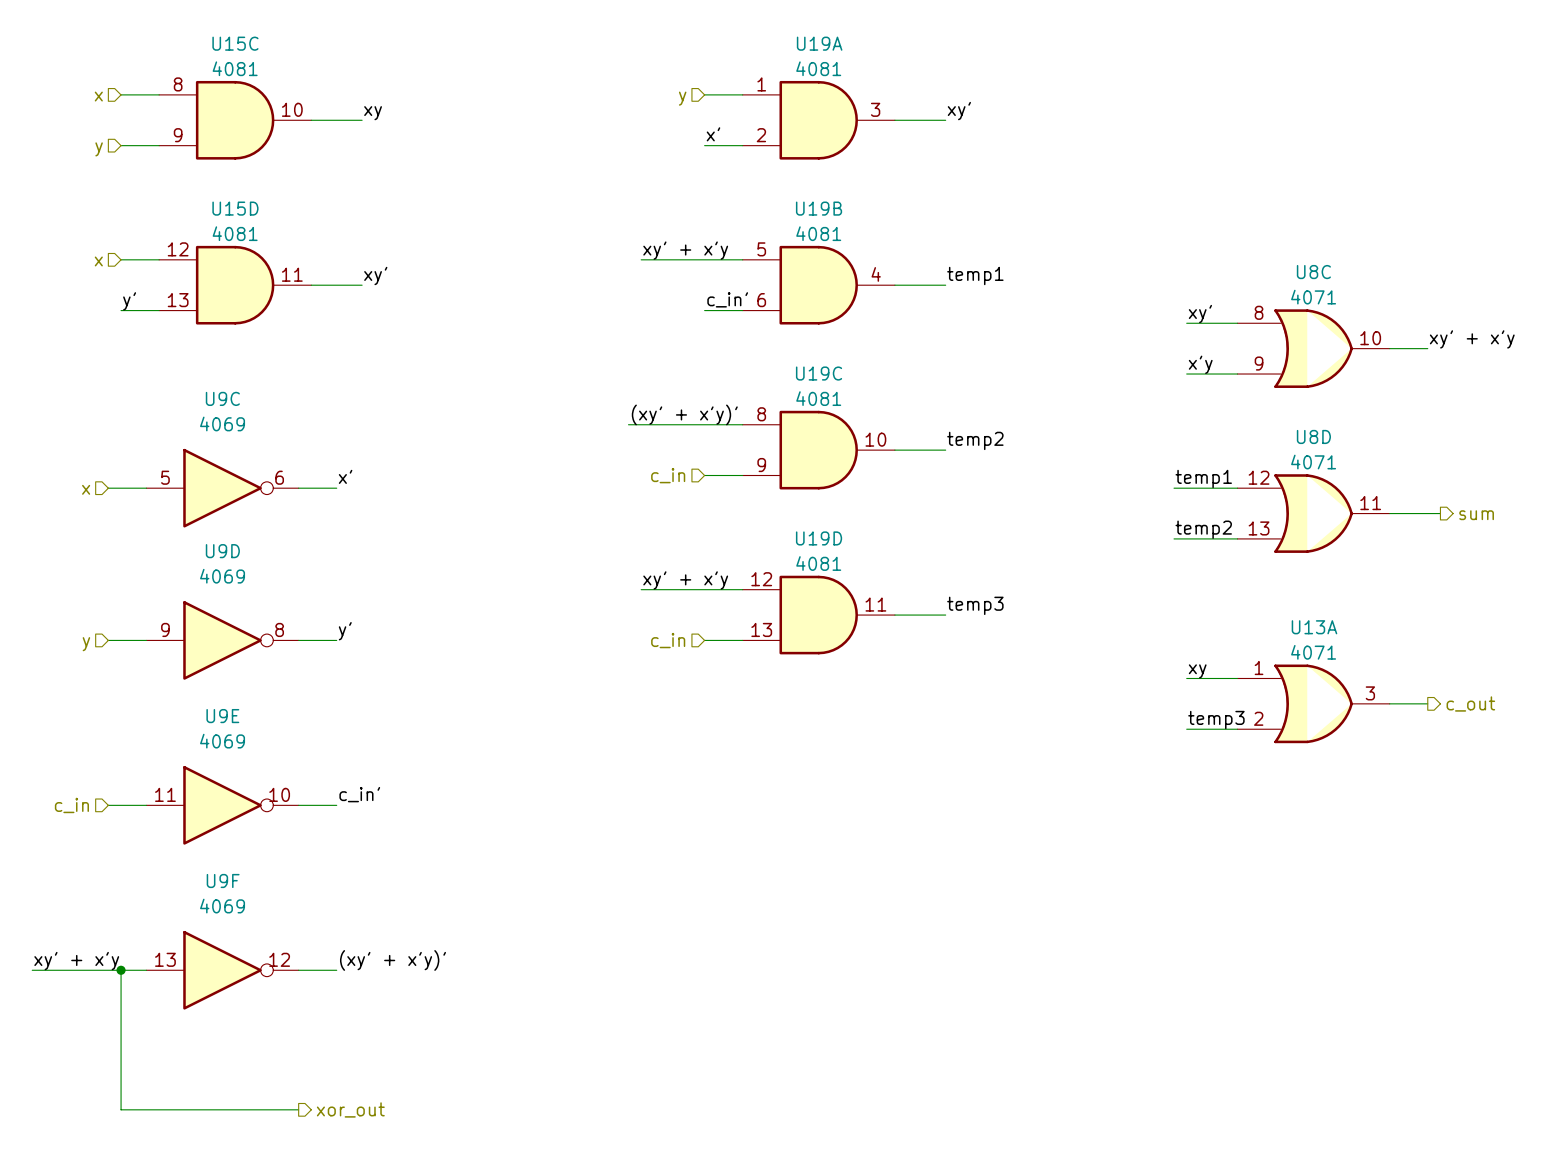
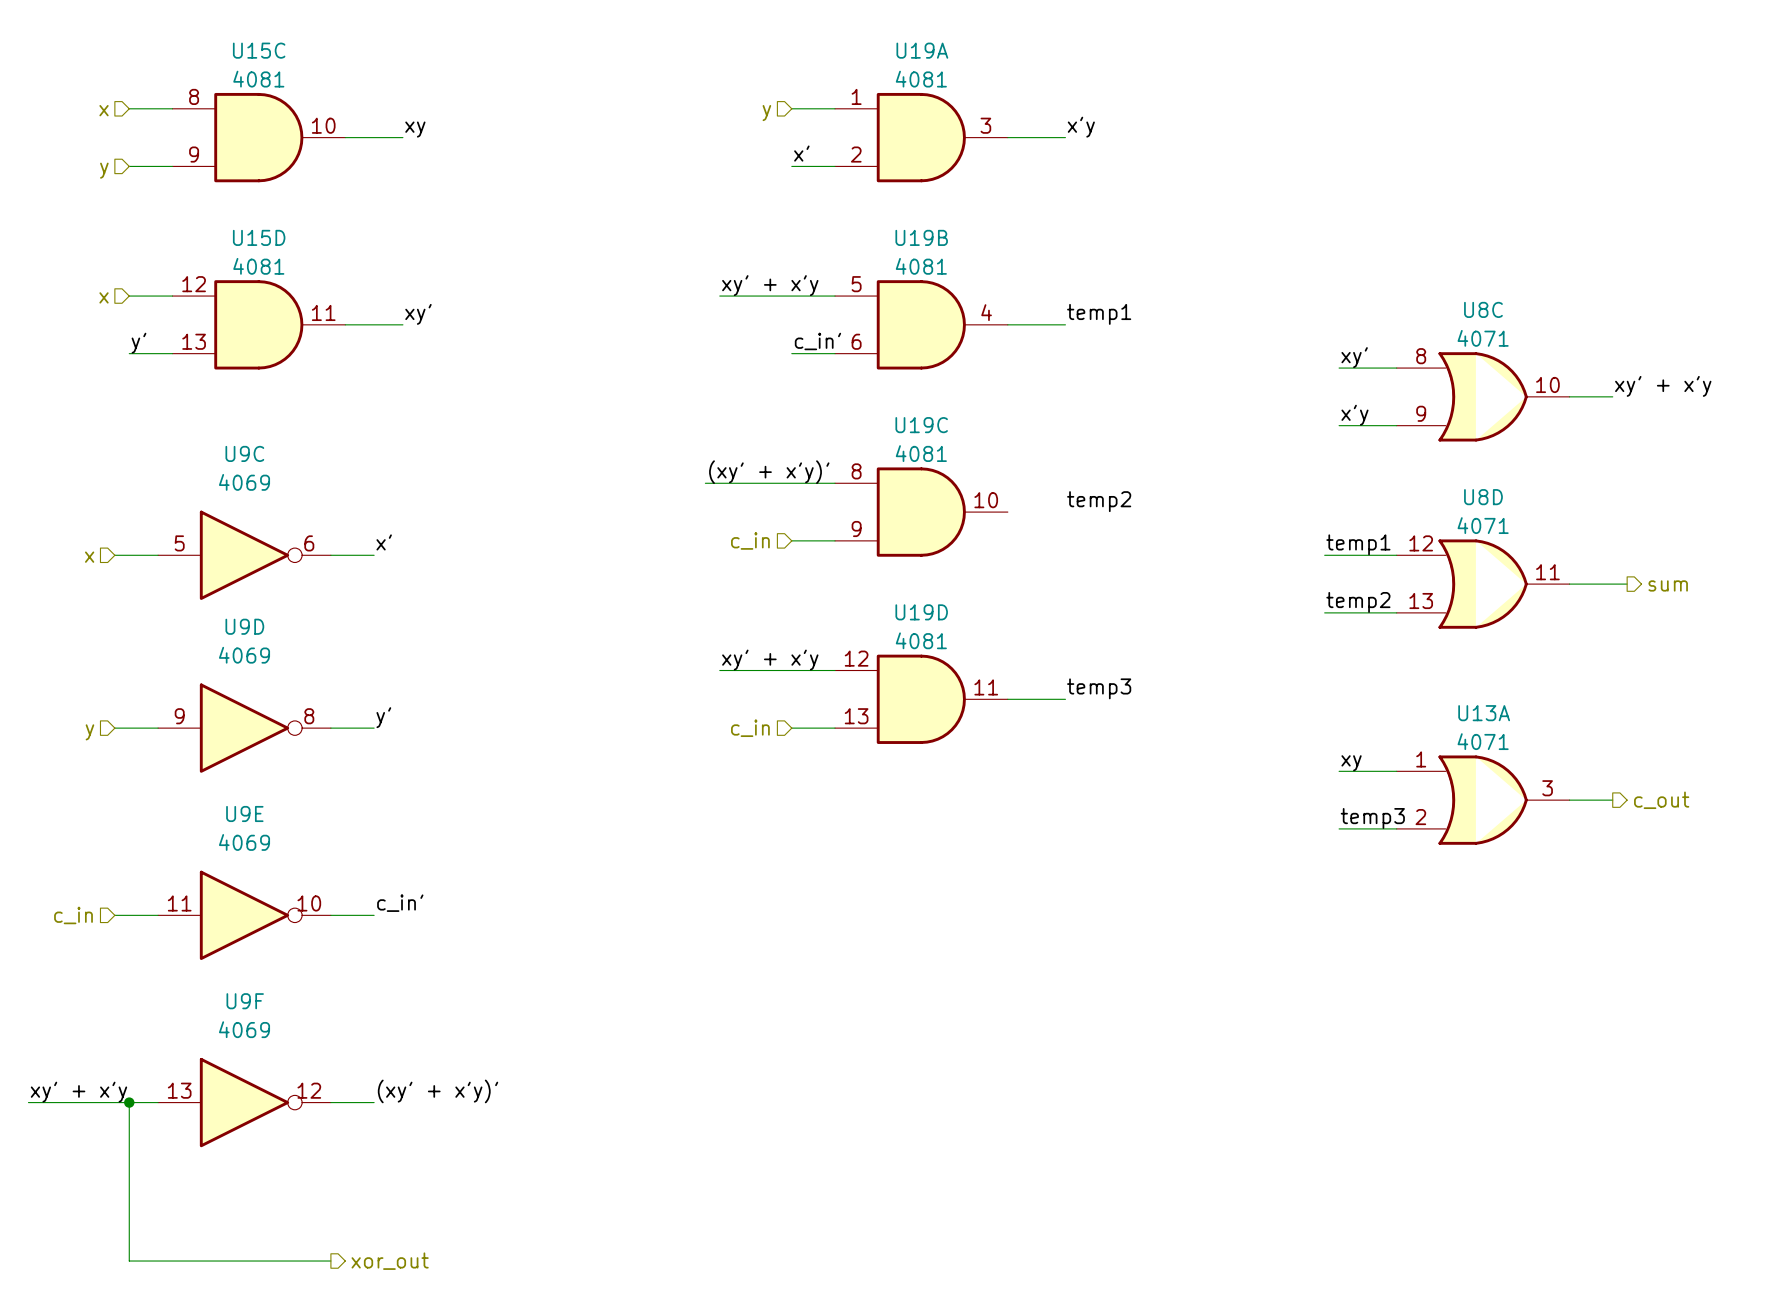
label: xy' (959, 111) -> x'y (1081, 127)
wire: (894, 450) (945, 450) -> none

